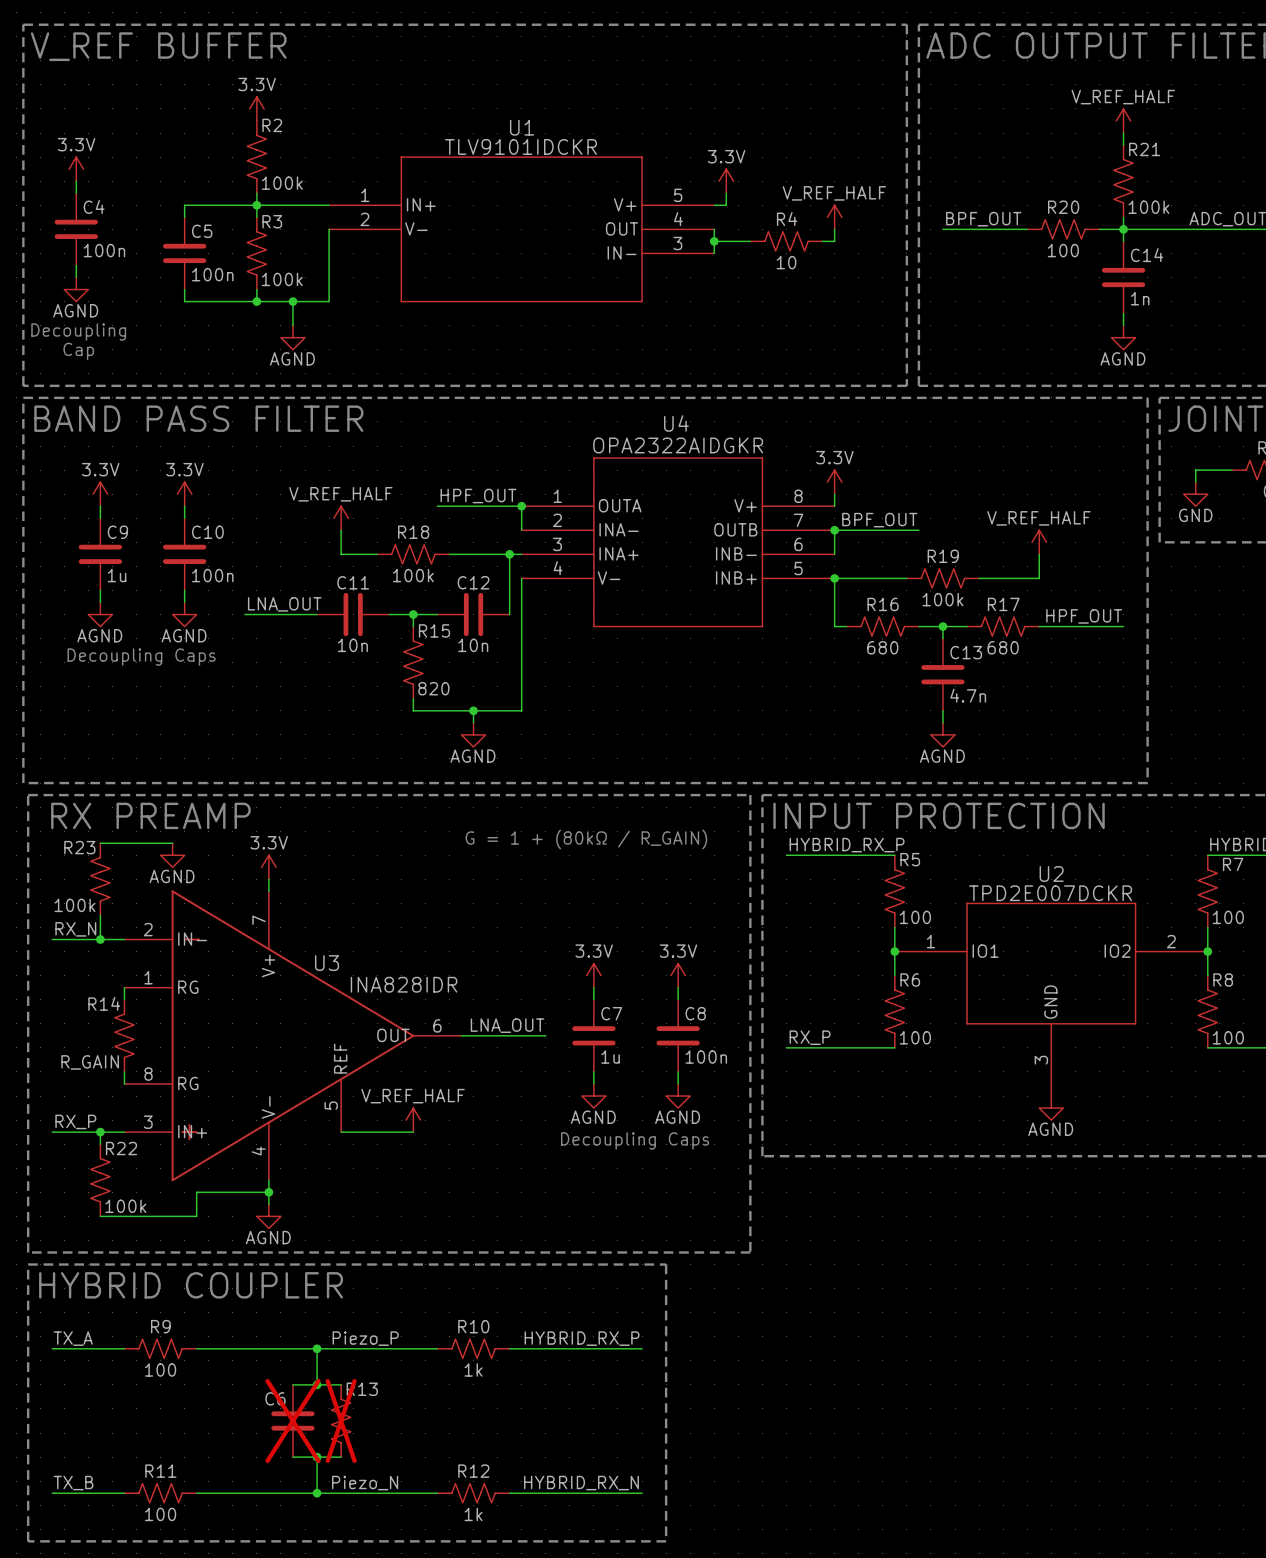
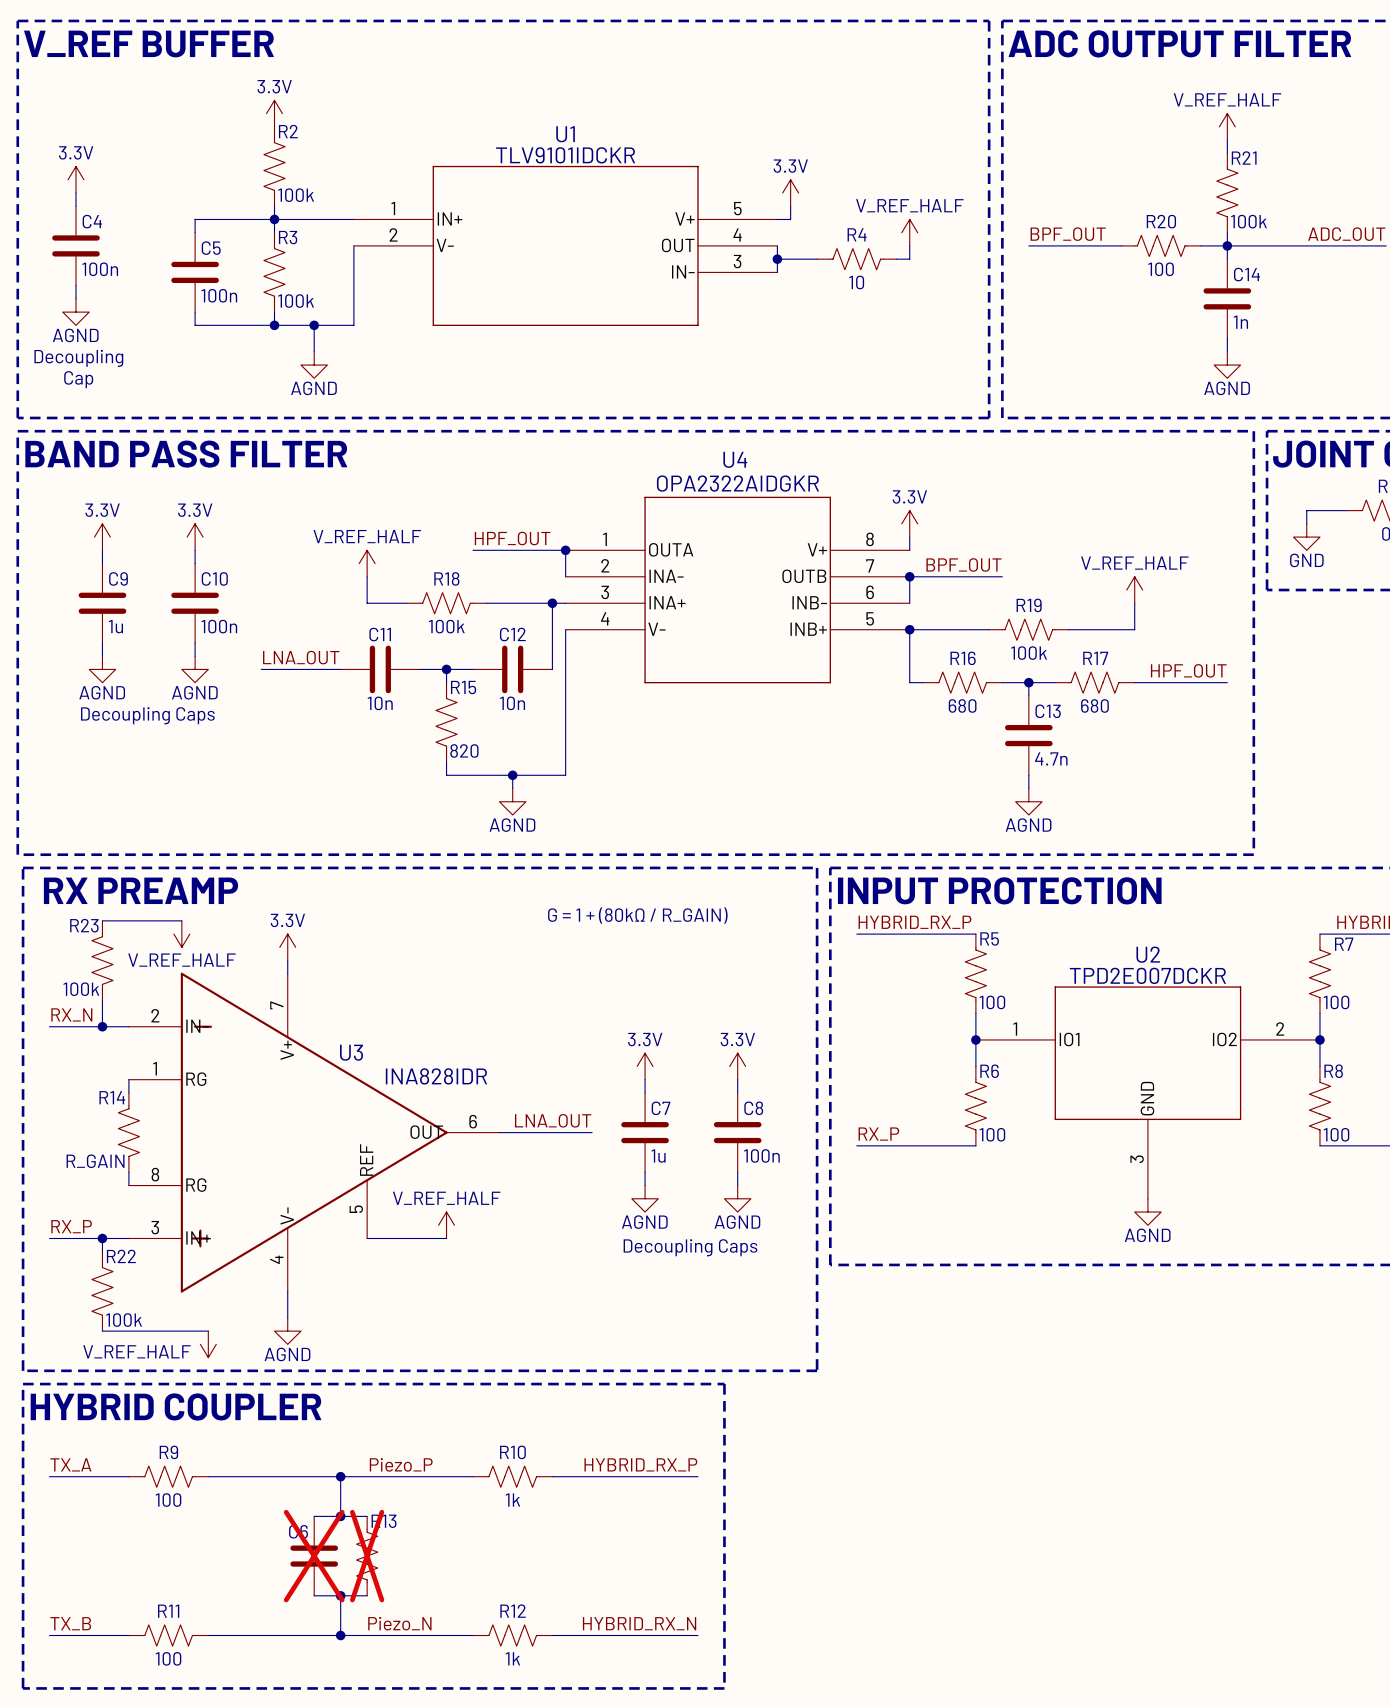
power symbol: AGND (172, 855) -> V_REF_HALF (181, 934)
wire: (268, 1192) (196, 1192) (196, 1216) -> none
junction: (268, 1192) -> none
power symbol: none -> V_REF_HALF (208, 1344)

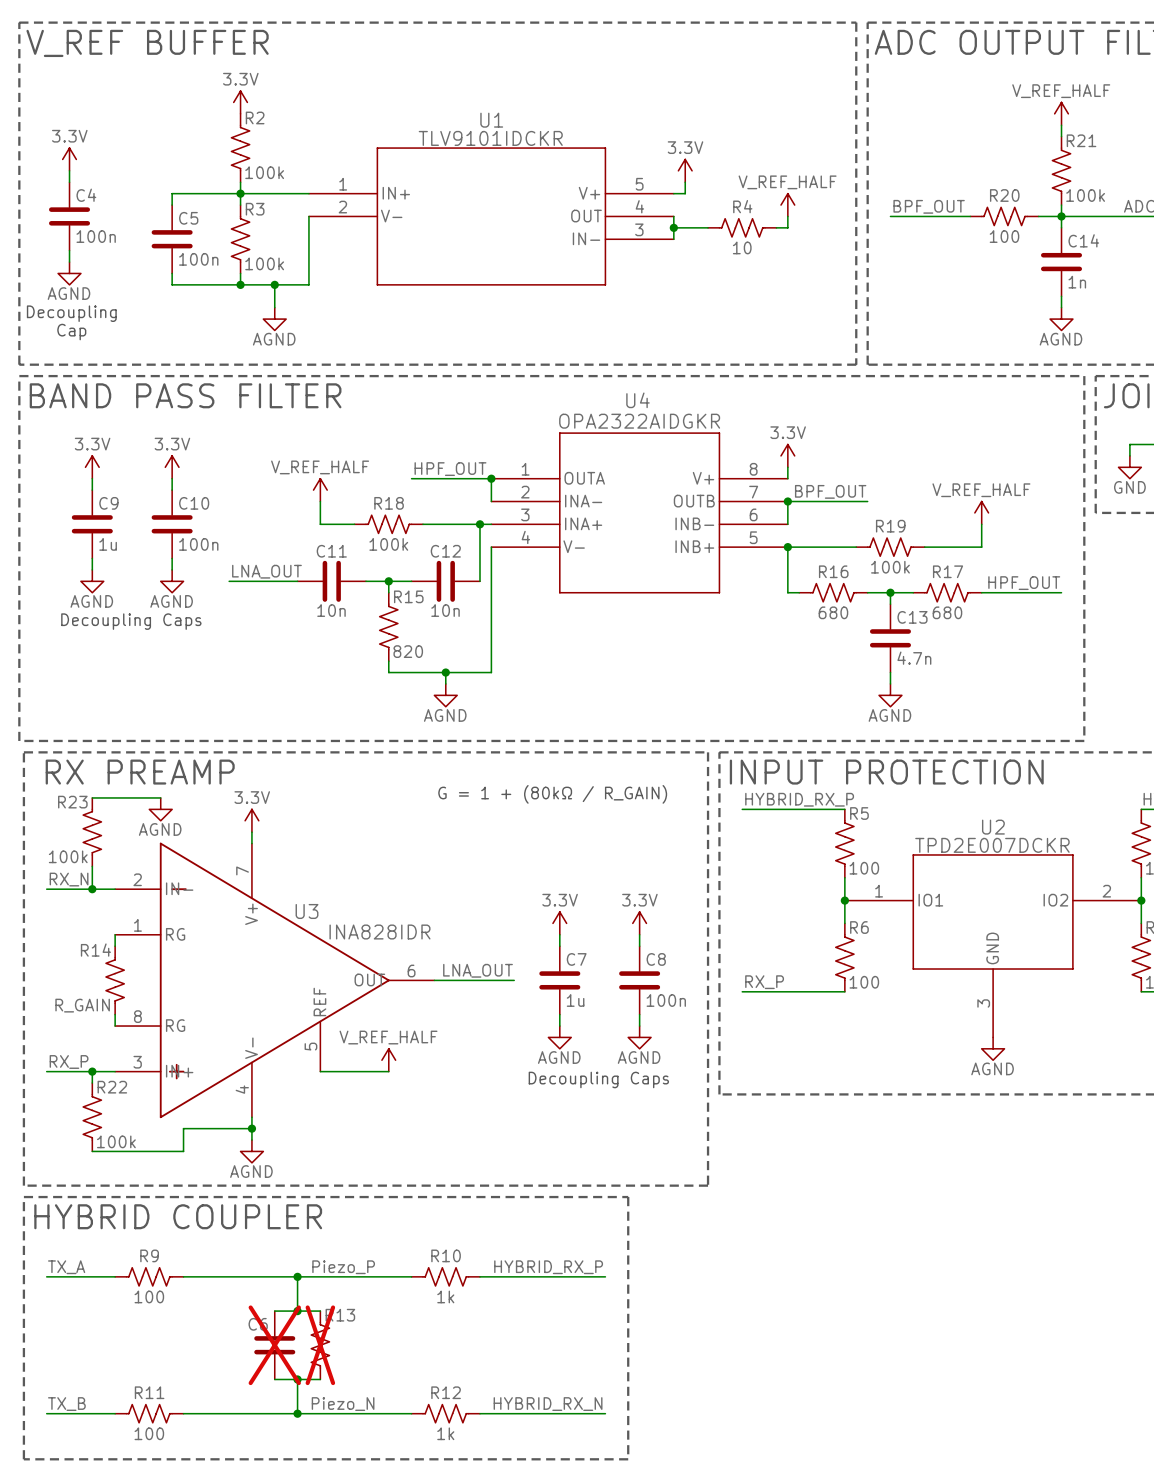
power symbol: V_REF_HALF (181, 934) -> AGND (160, 809)
wire: none -> (251, 1128) (183, 1128) (183, 1151)
junction: none -> (251, 1128)
power symbol: V_REF_HALF (208, 1344) -> none

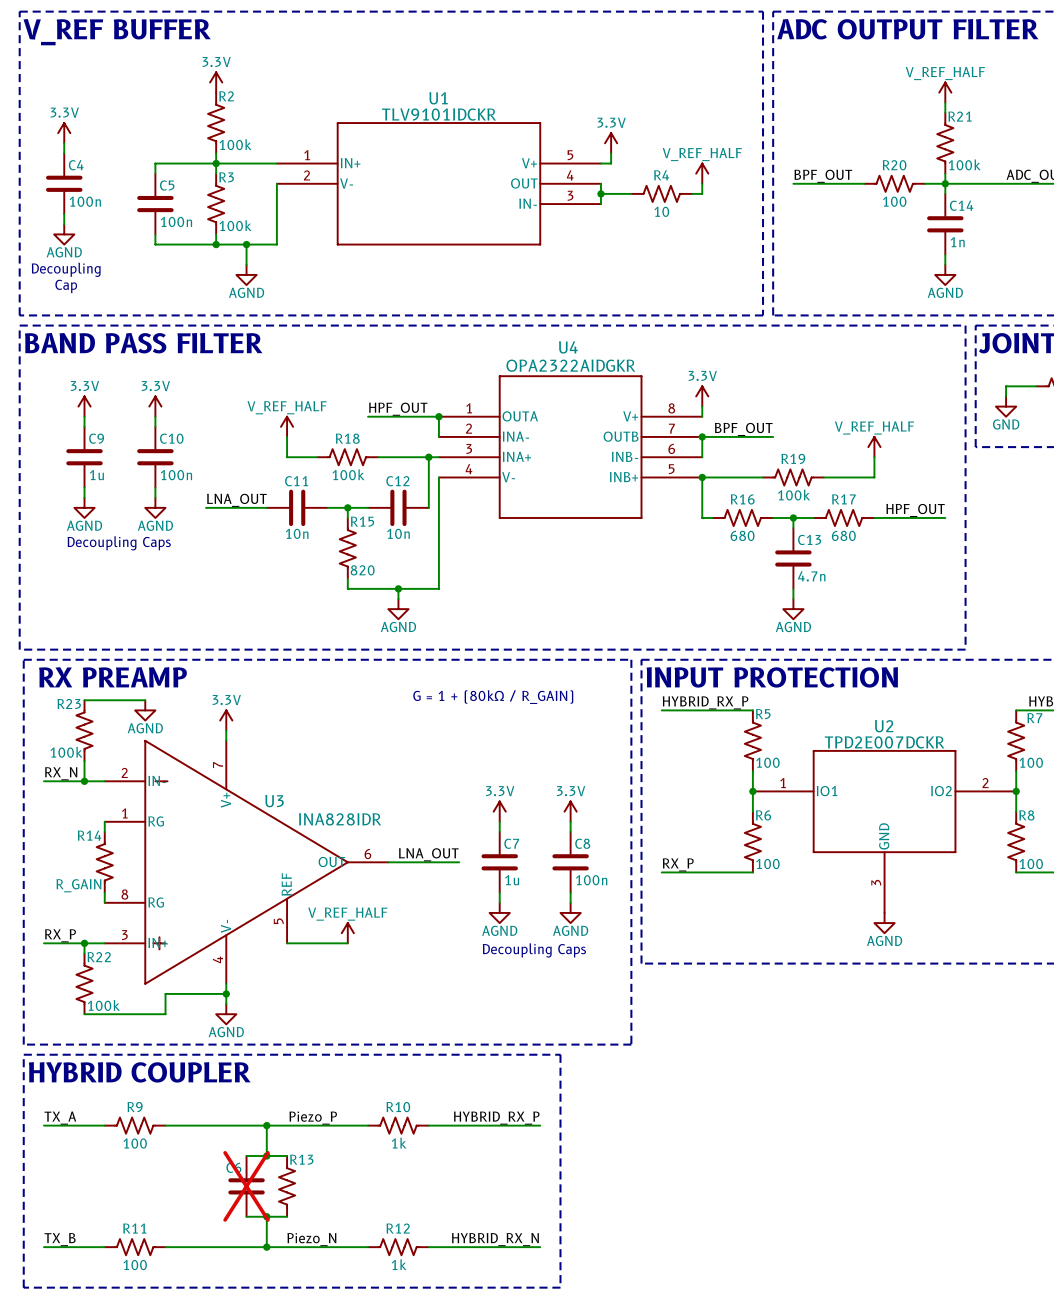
R13 do-not-place cross: (320, 1345) -> none

